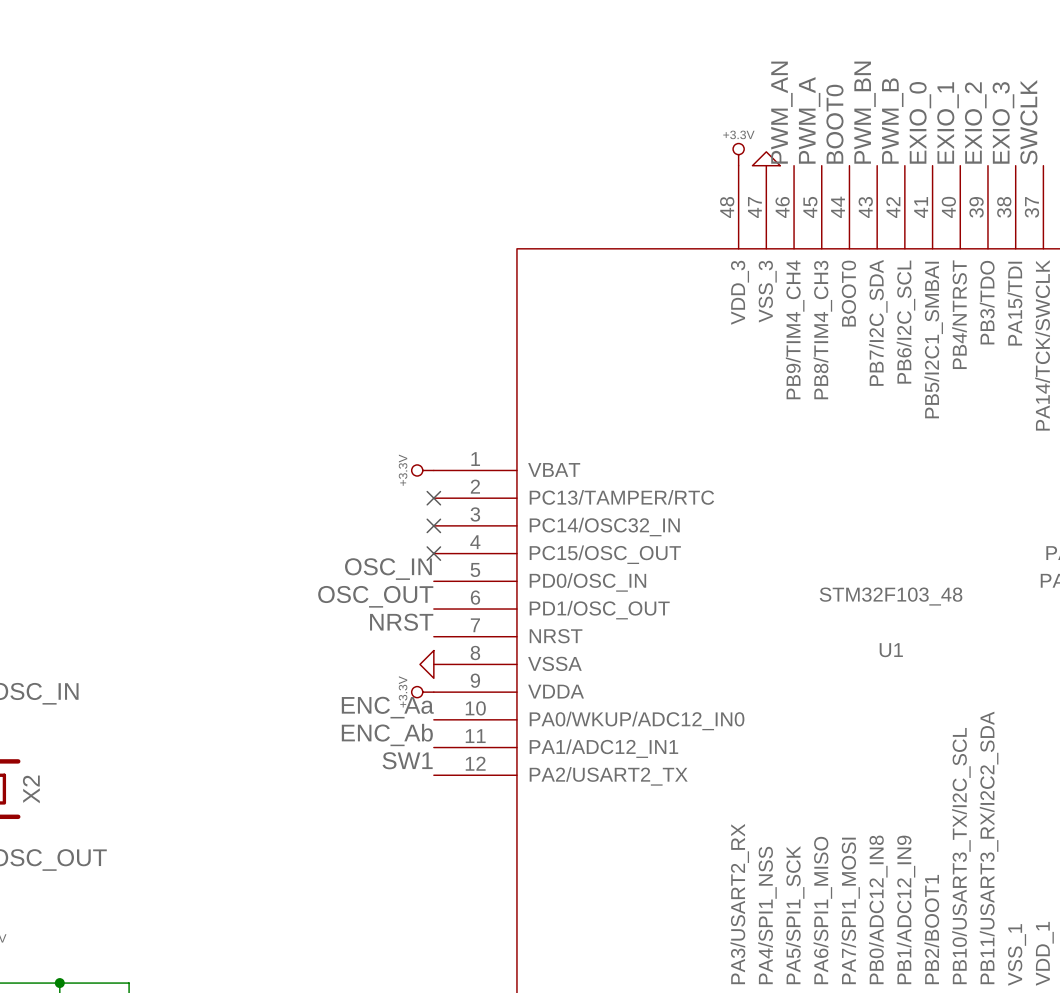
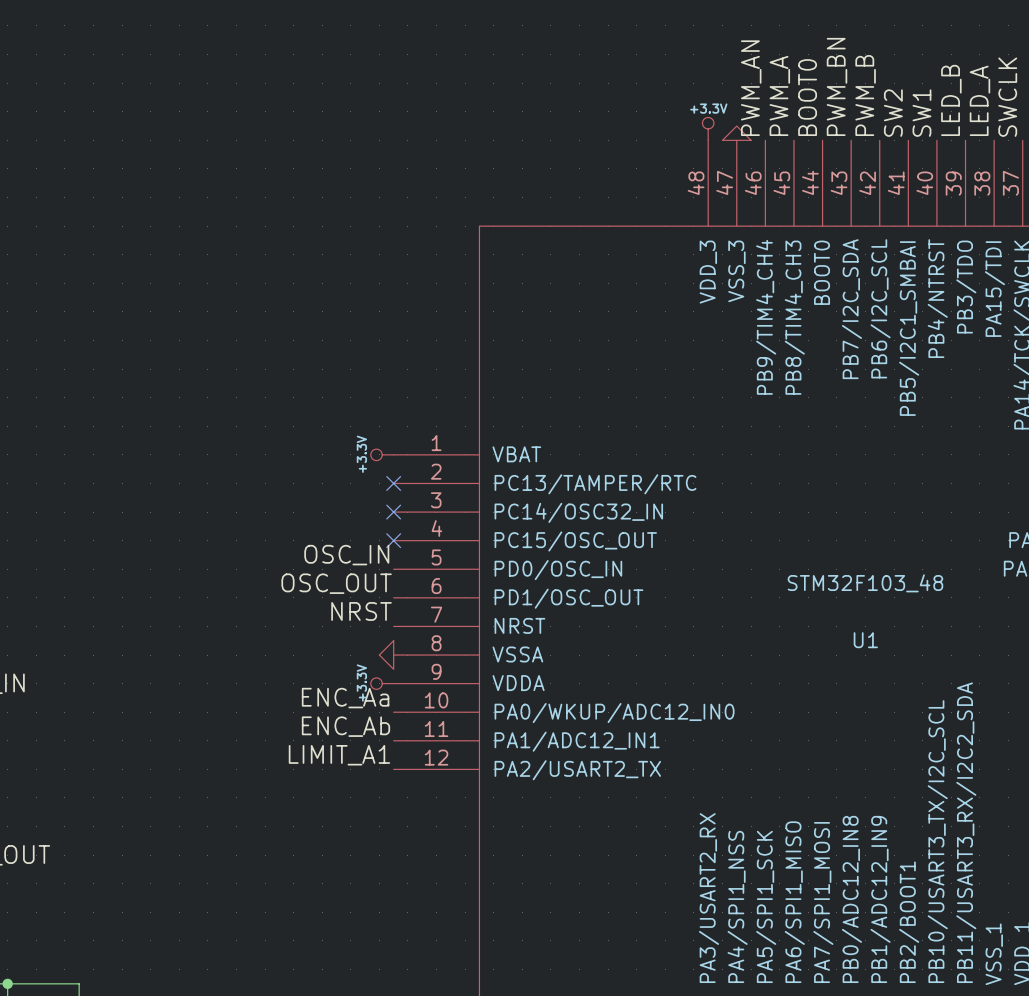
label: EXIO_0 (920, 122) -> SW2 (893, 113)
label: EXIO_1 (948, 122) -> SW1 (921, 113)
label: EXIO_3 (1003, 122) -> LED_A (979, 100)
label: EXIO_2 (975, 123) -> LED_B (951, 100)
label: SW1 (407, 760) -> LIMIT_A1 (339, 755)

